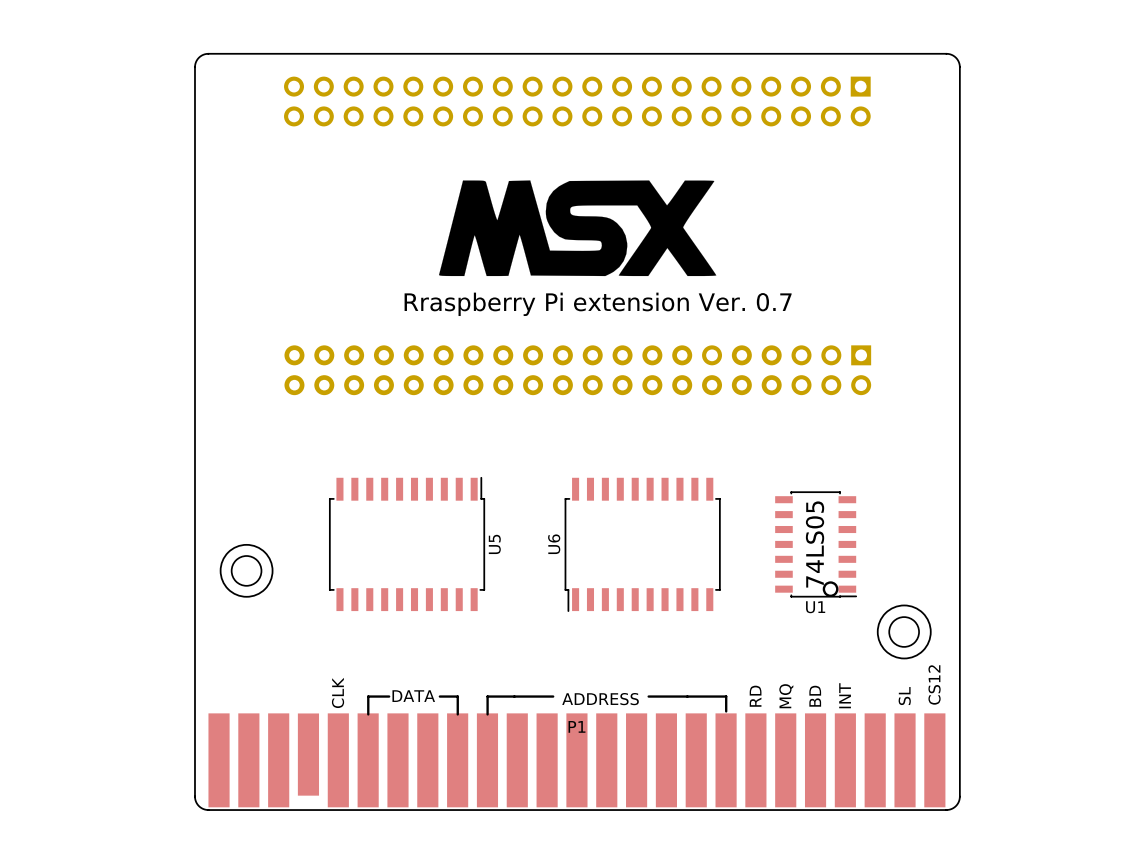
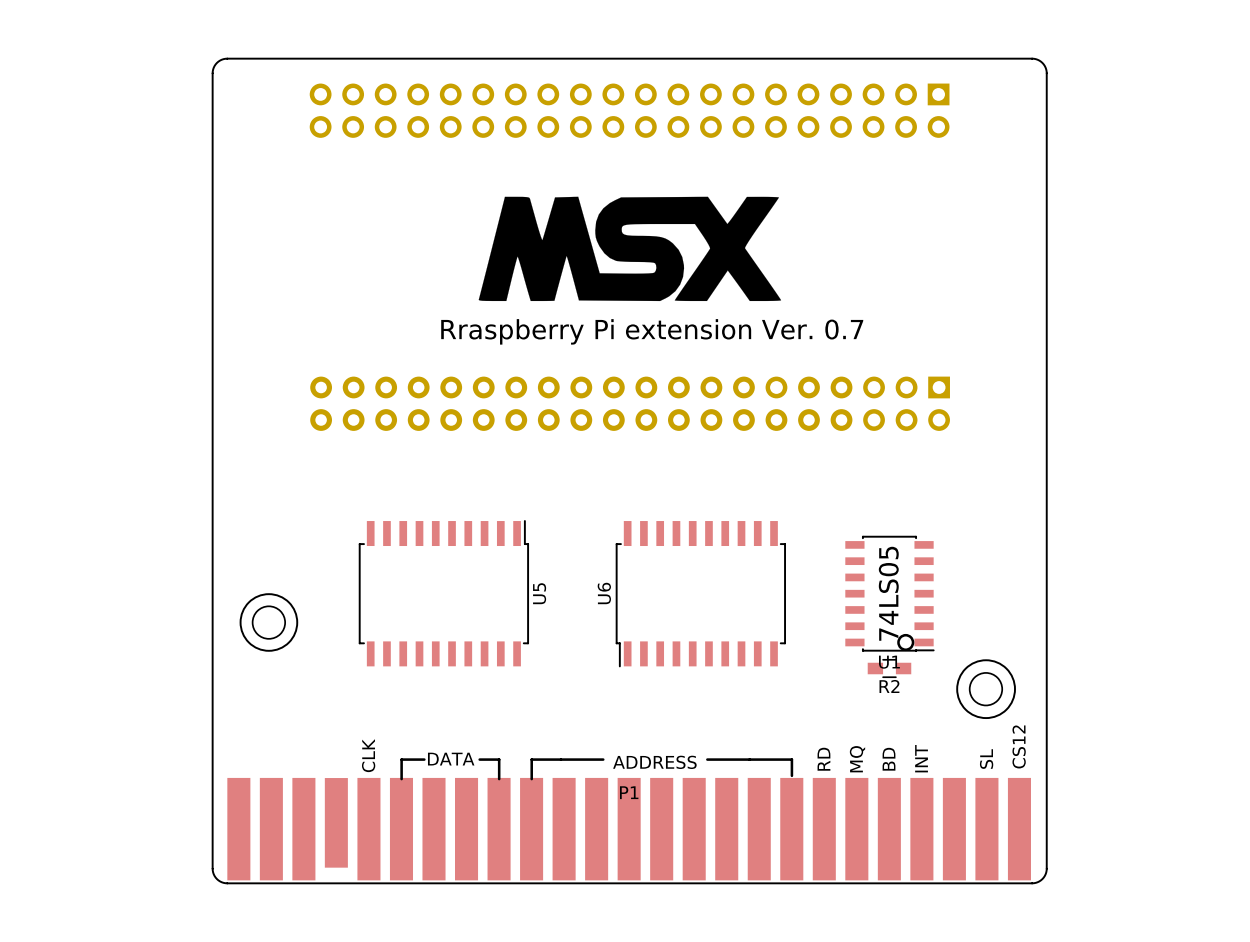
R2: none -> (889, 668)

